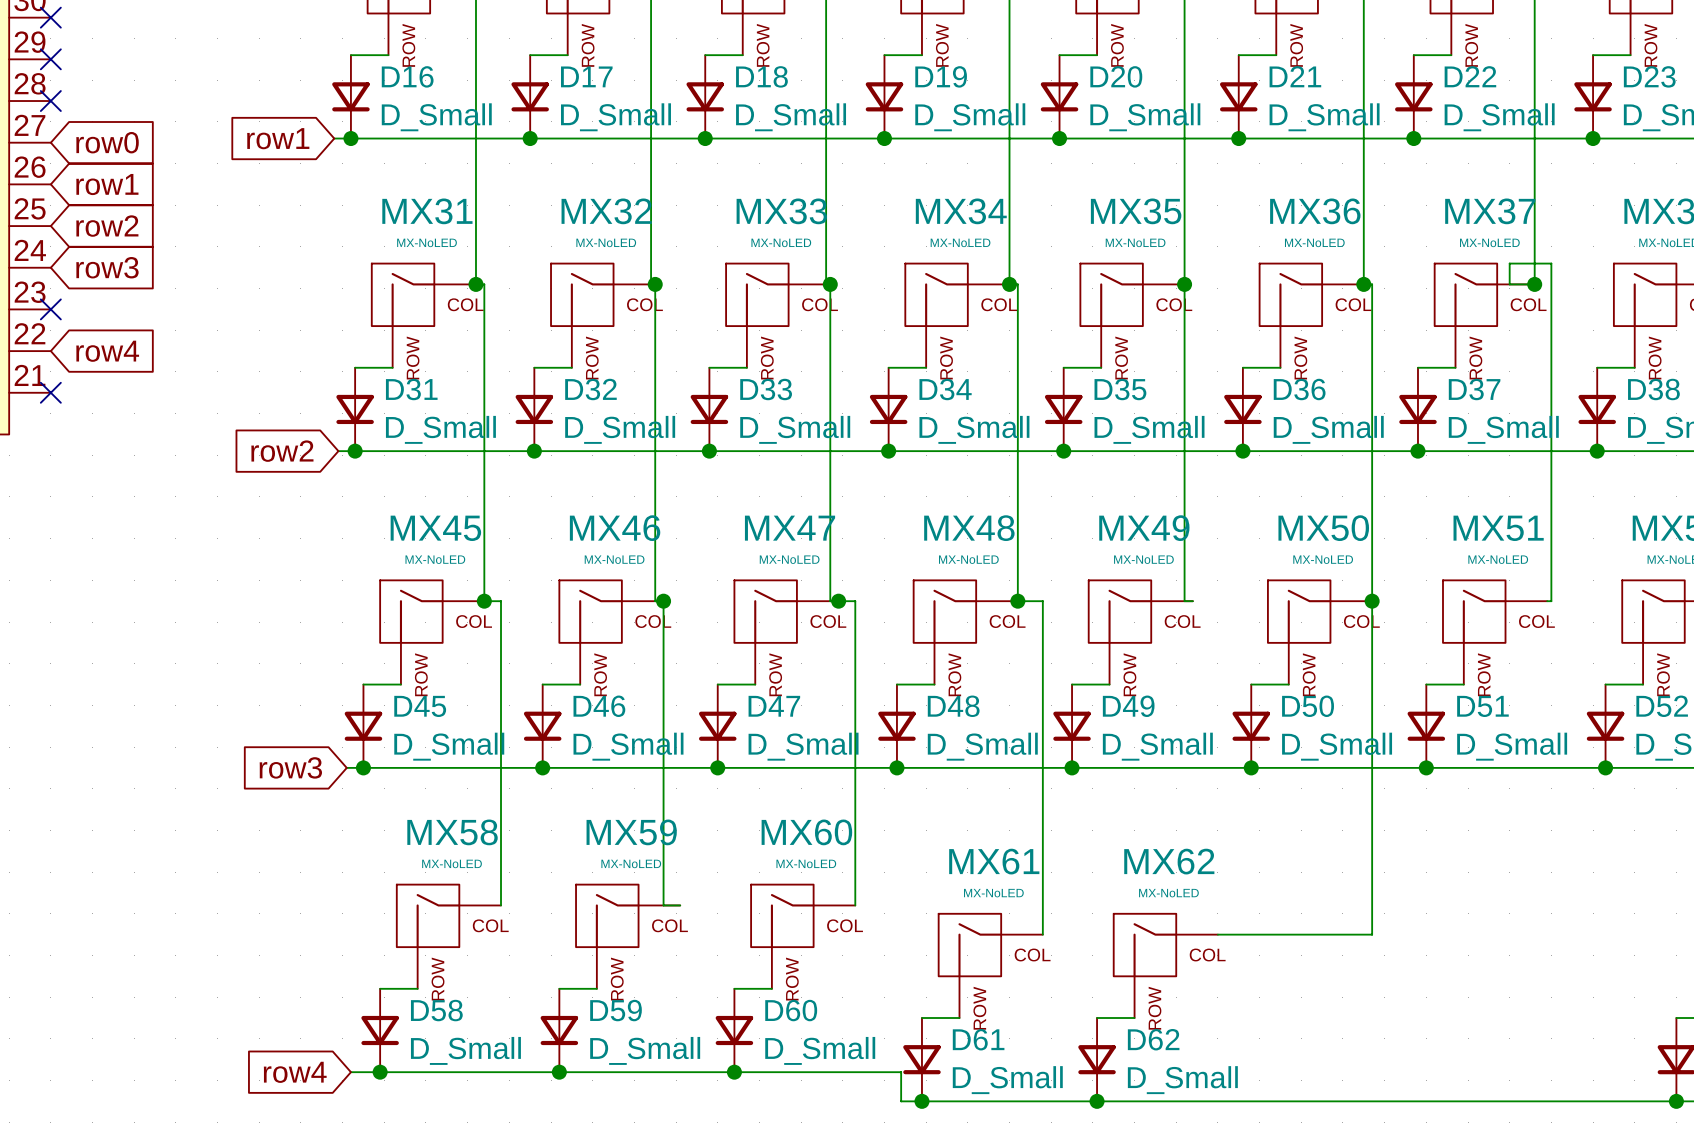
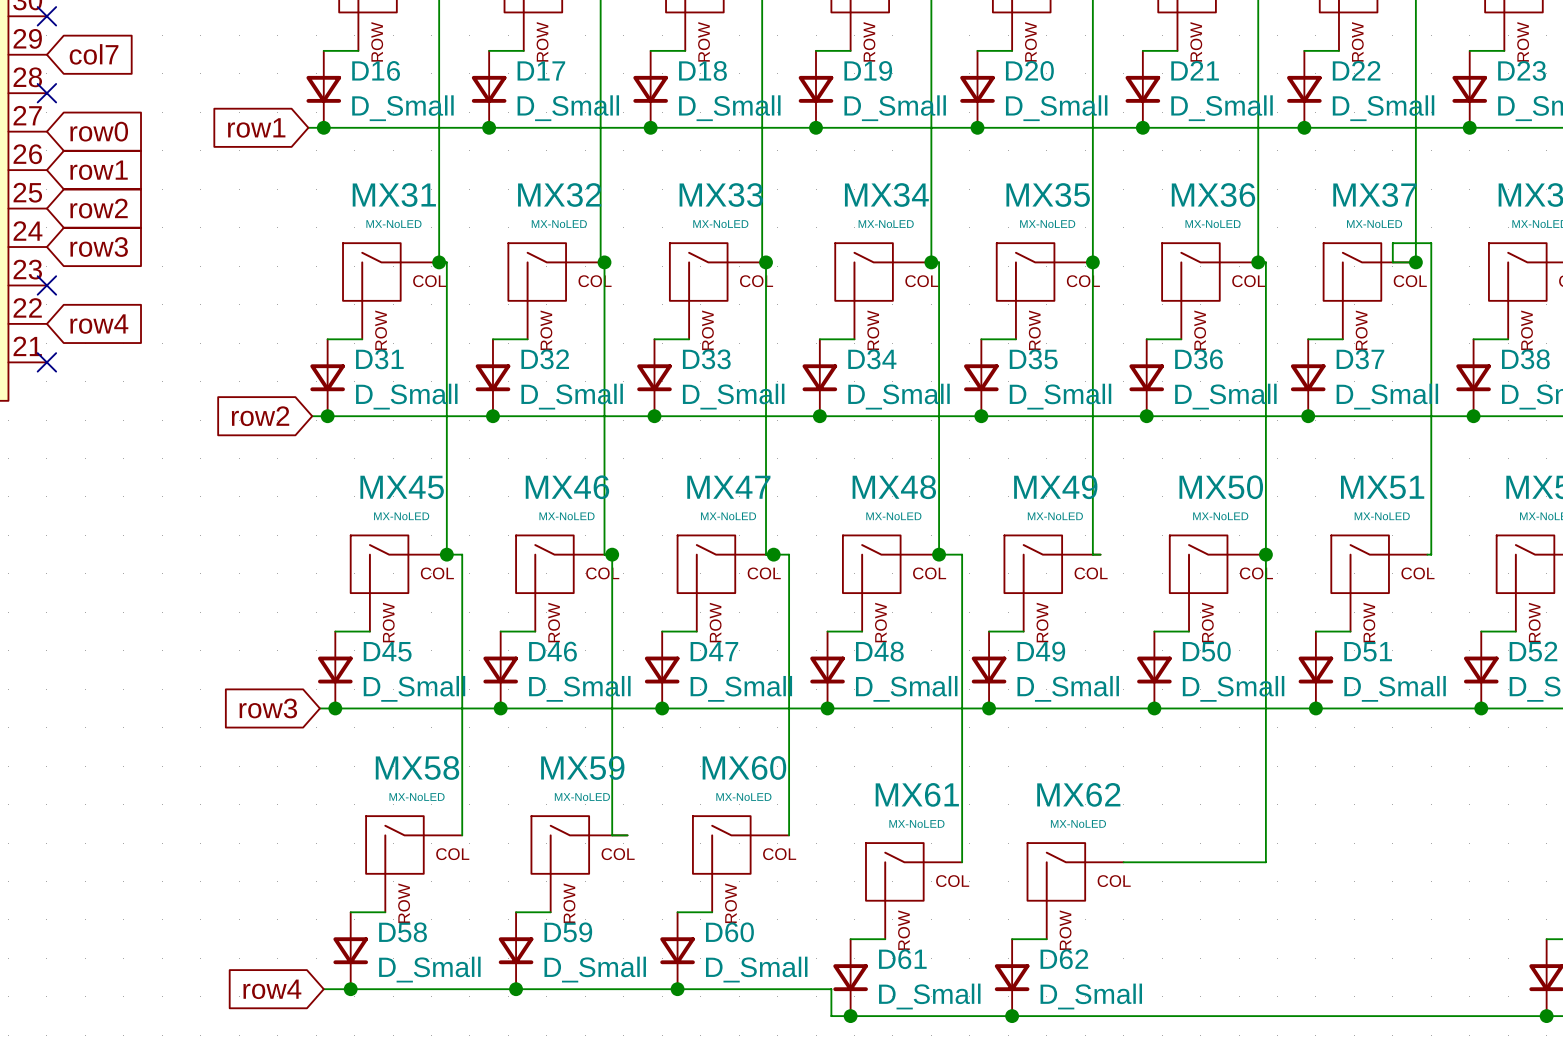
global label: none -> col7 (94, 54)
no-connect mark: (50, 59) -> none

